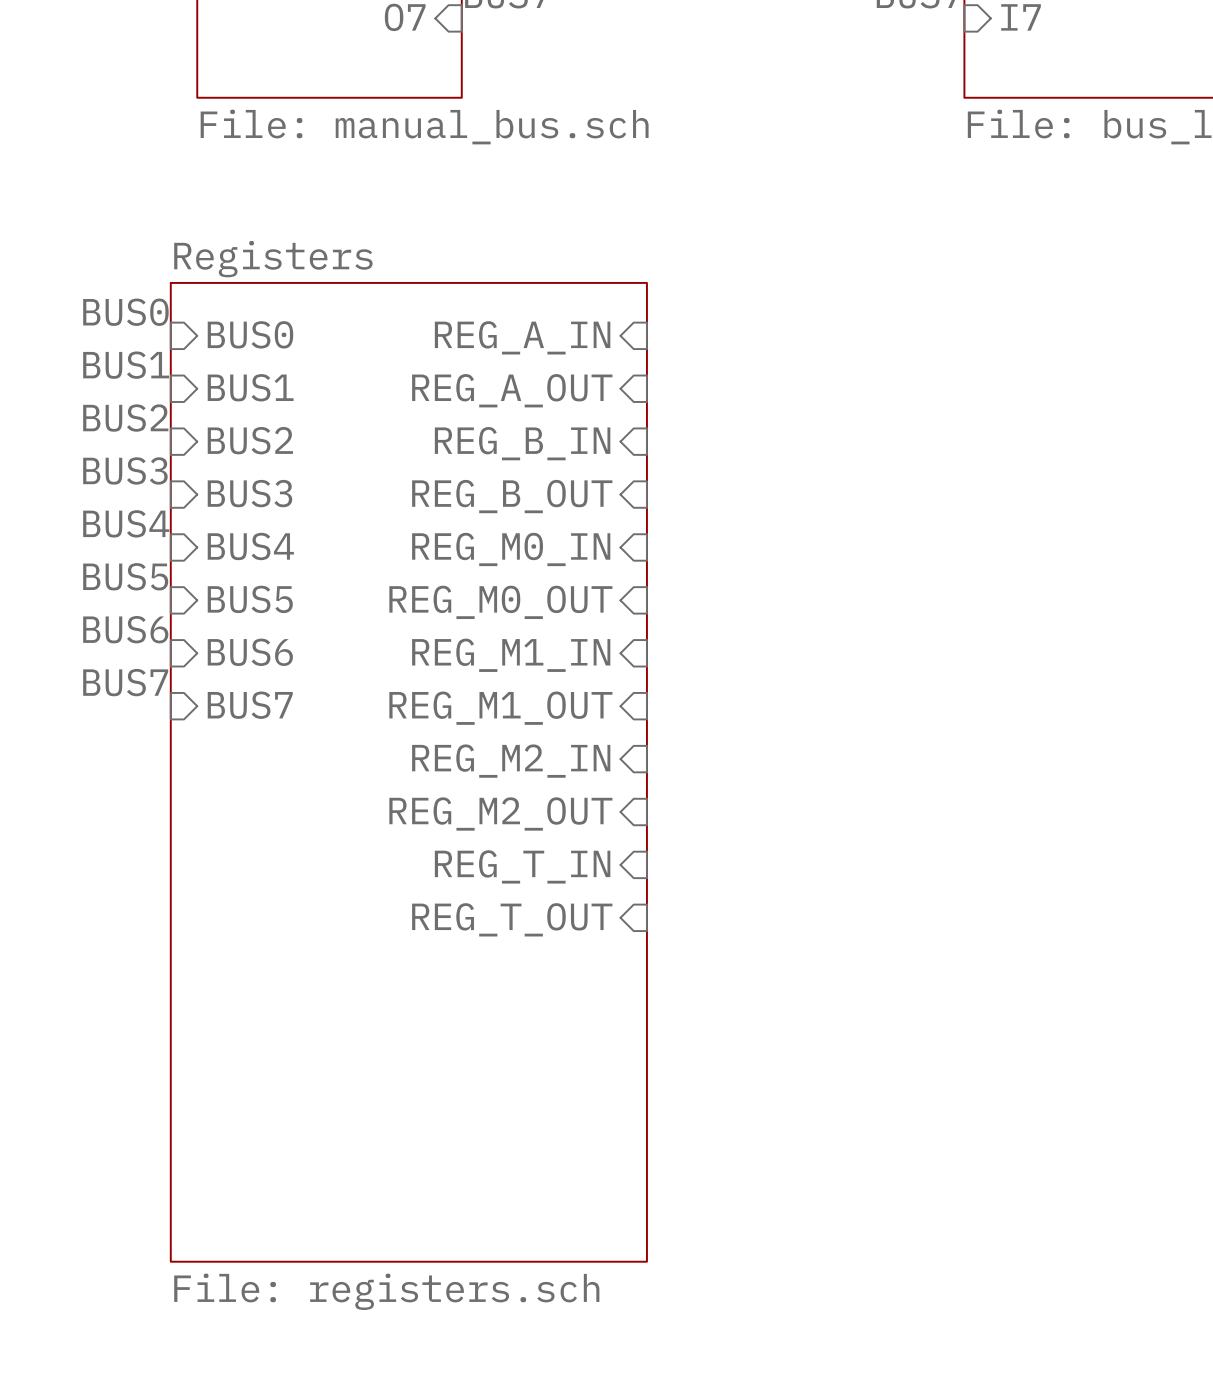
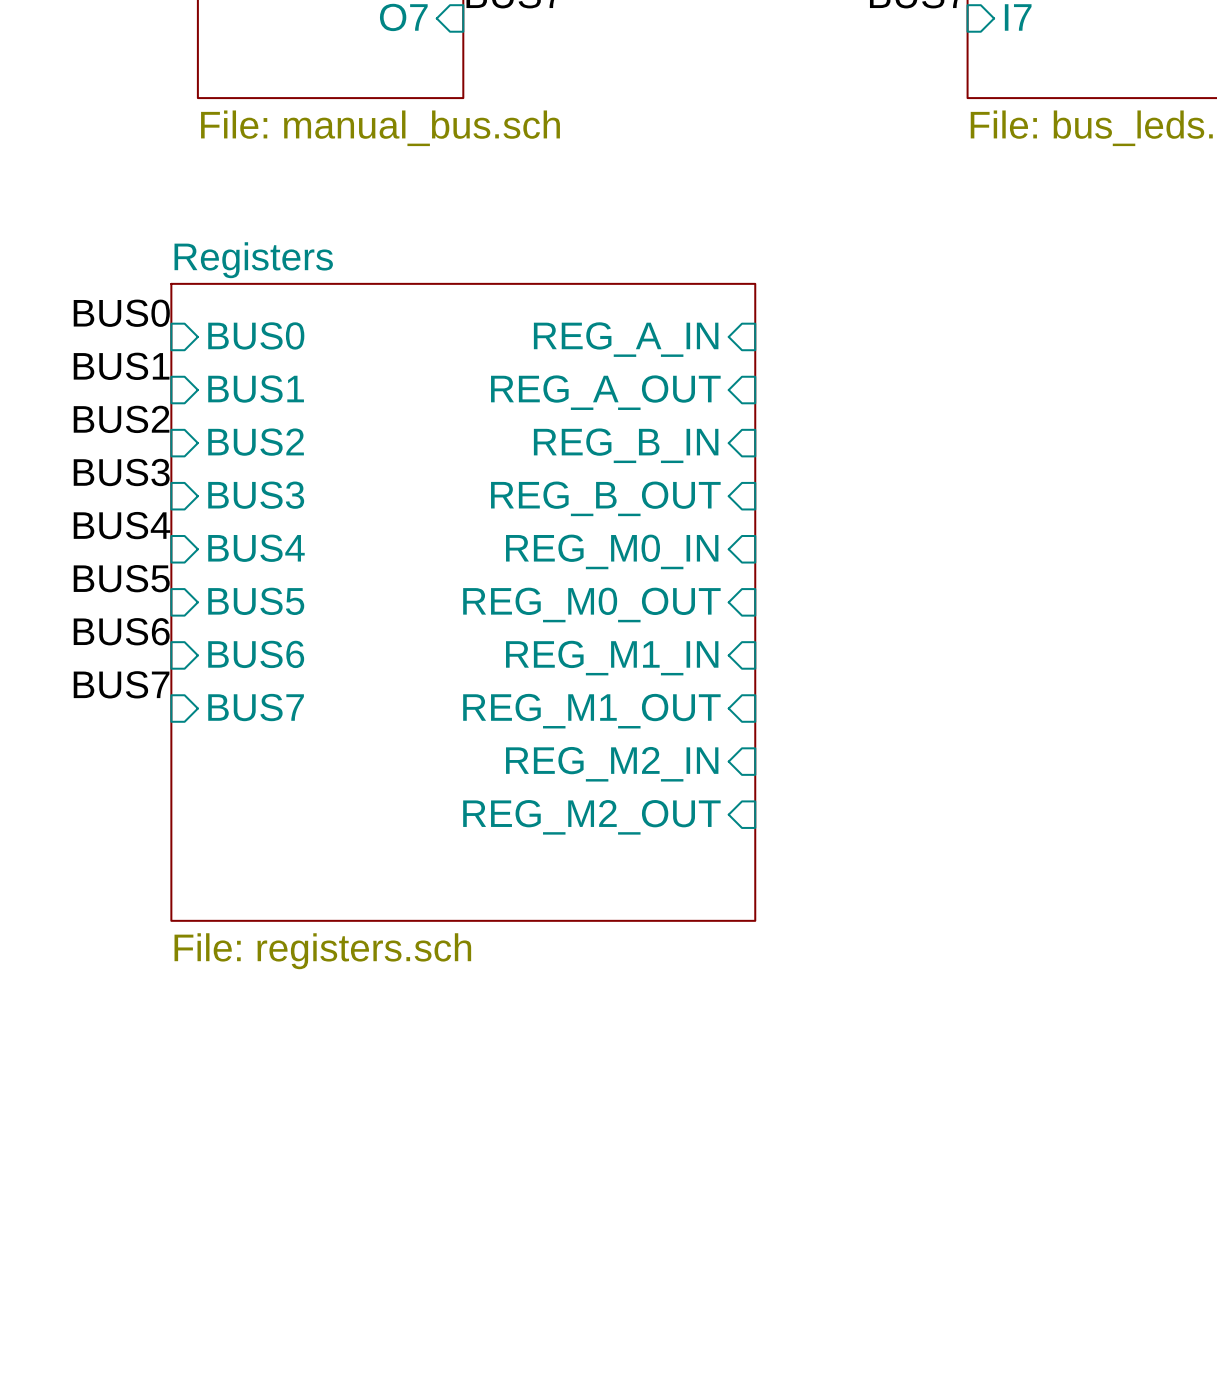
sheet pin position: REG_A_IN (522, 337) -> REG_A_IN (626, 339)
sheet pin position: REG_A_OUT (512, 390) -> REG_A_OUT (605, 392)
sheet pin position: REG_B_IN (522, 443) -> REG_B_IN (626, 445)
sheet pin position: REG_B_OUT (512, 496) -> REG_B_OUT (605, 498)
sheet pin position: REG_M0_IN (511, 549) -> REG_M0_IN (612, 551)
sheet Registers: none -> File: registers.sch (463, 602)
sheet pin position: REG_M0_OUT (500, 602) -> REG_M0_OUT (591, 604)
sheet pin position: REG_M1_IN (511, 655) -> REG_M1_IN (612, 658)
sheet pin position: REG_M1_OUT (500, 708) -> REG_M1_OUT (591, 711)
sheet pin position: REG_M2_IN (511, 761) -> REG_M2_IN (612, 764)
sheet Registers: File: registers.sch (408, 772) -> none
sheet pin position: REG_M2_OUT (500, 813) -> REG_M2_OUT (591, 817)
sheet pin: REG_T_IN (522, 866) -> none
sheet pin: REG_T_OUT (512, 919) -> none

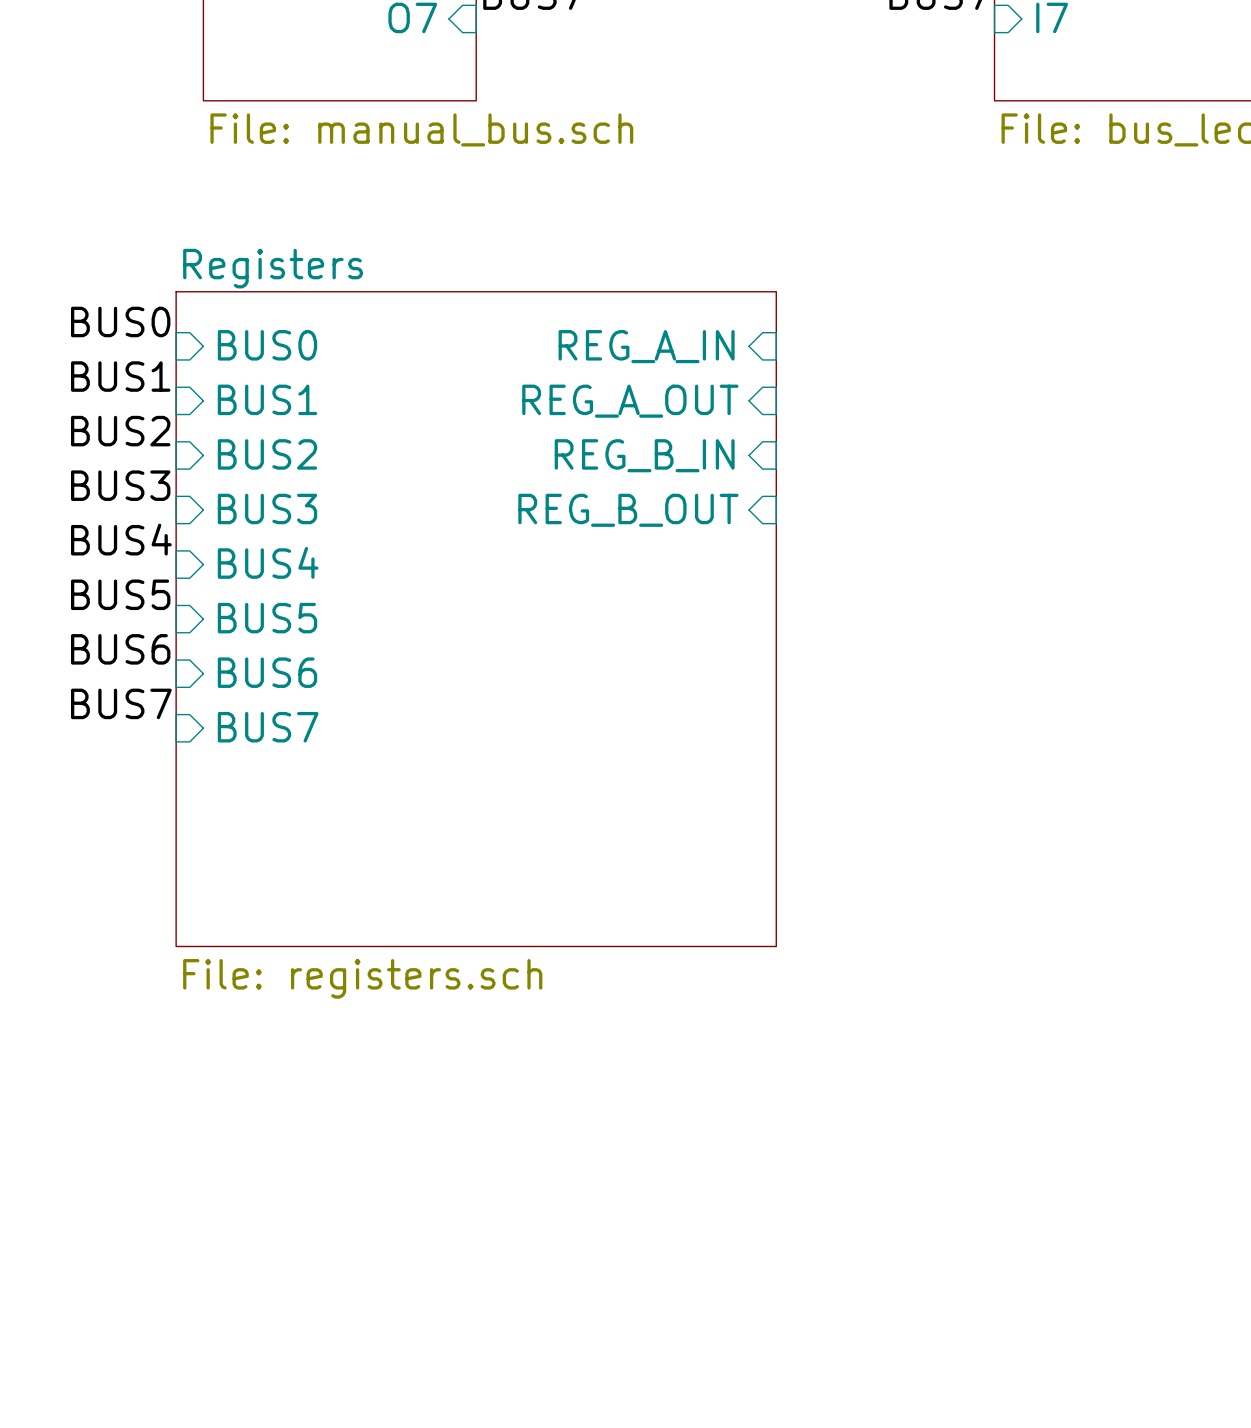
sheet pin: REG_M0_IN (612, 551) -> none
sheet pin: REG_M0_OUT (591, 604) -> none
sheet pin: REG_M1_IN (612, 658) -> none
sheet pin: REG_M1_OUT (591, 711) -> none
sheet pin: REG_M2_IN (612, 764) -> none
sheet pin: REG_M2_OUT (591, 817) -> none

